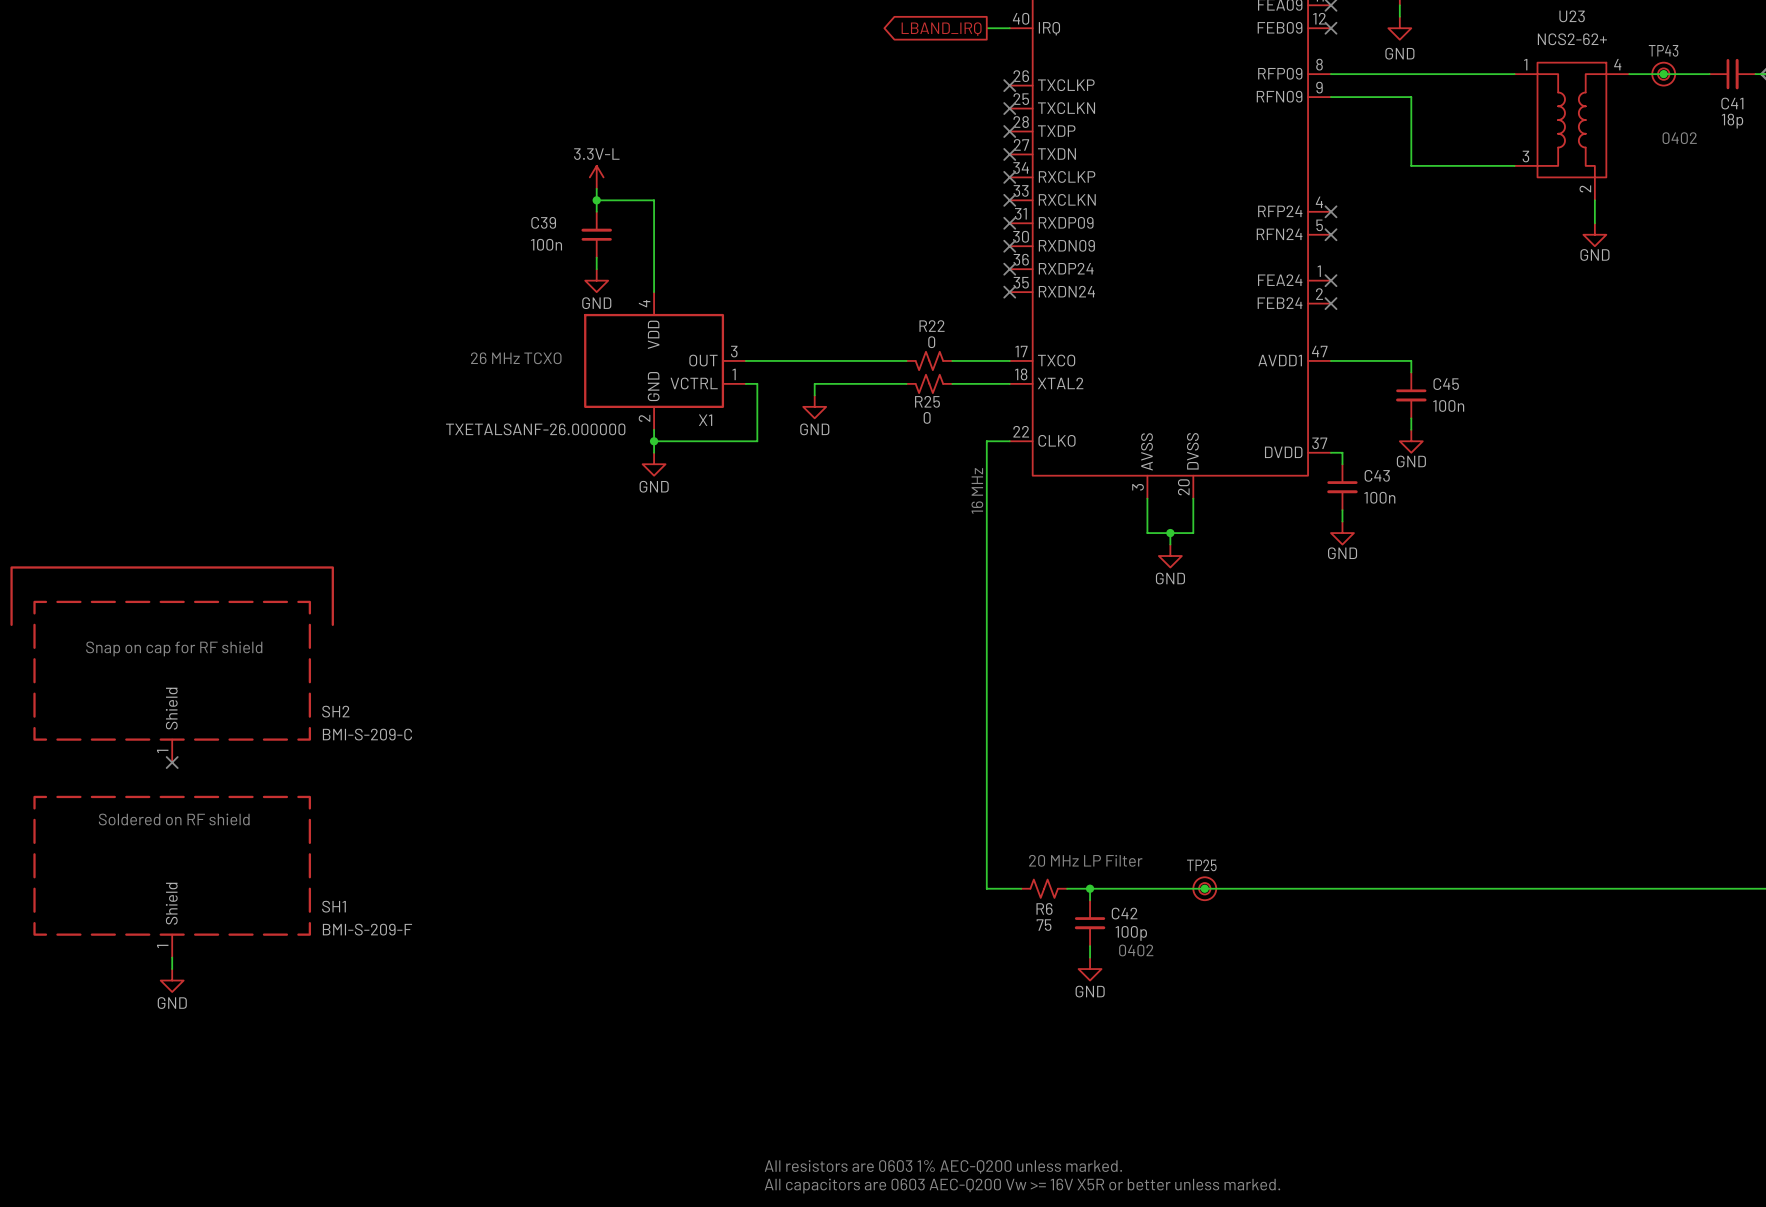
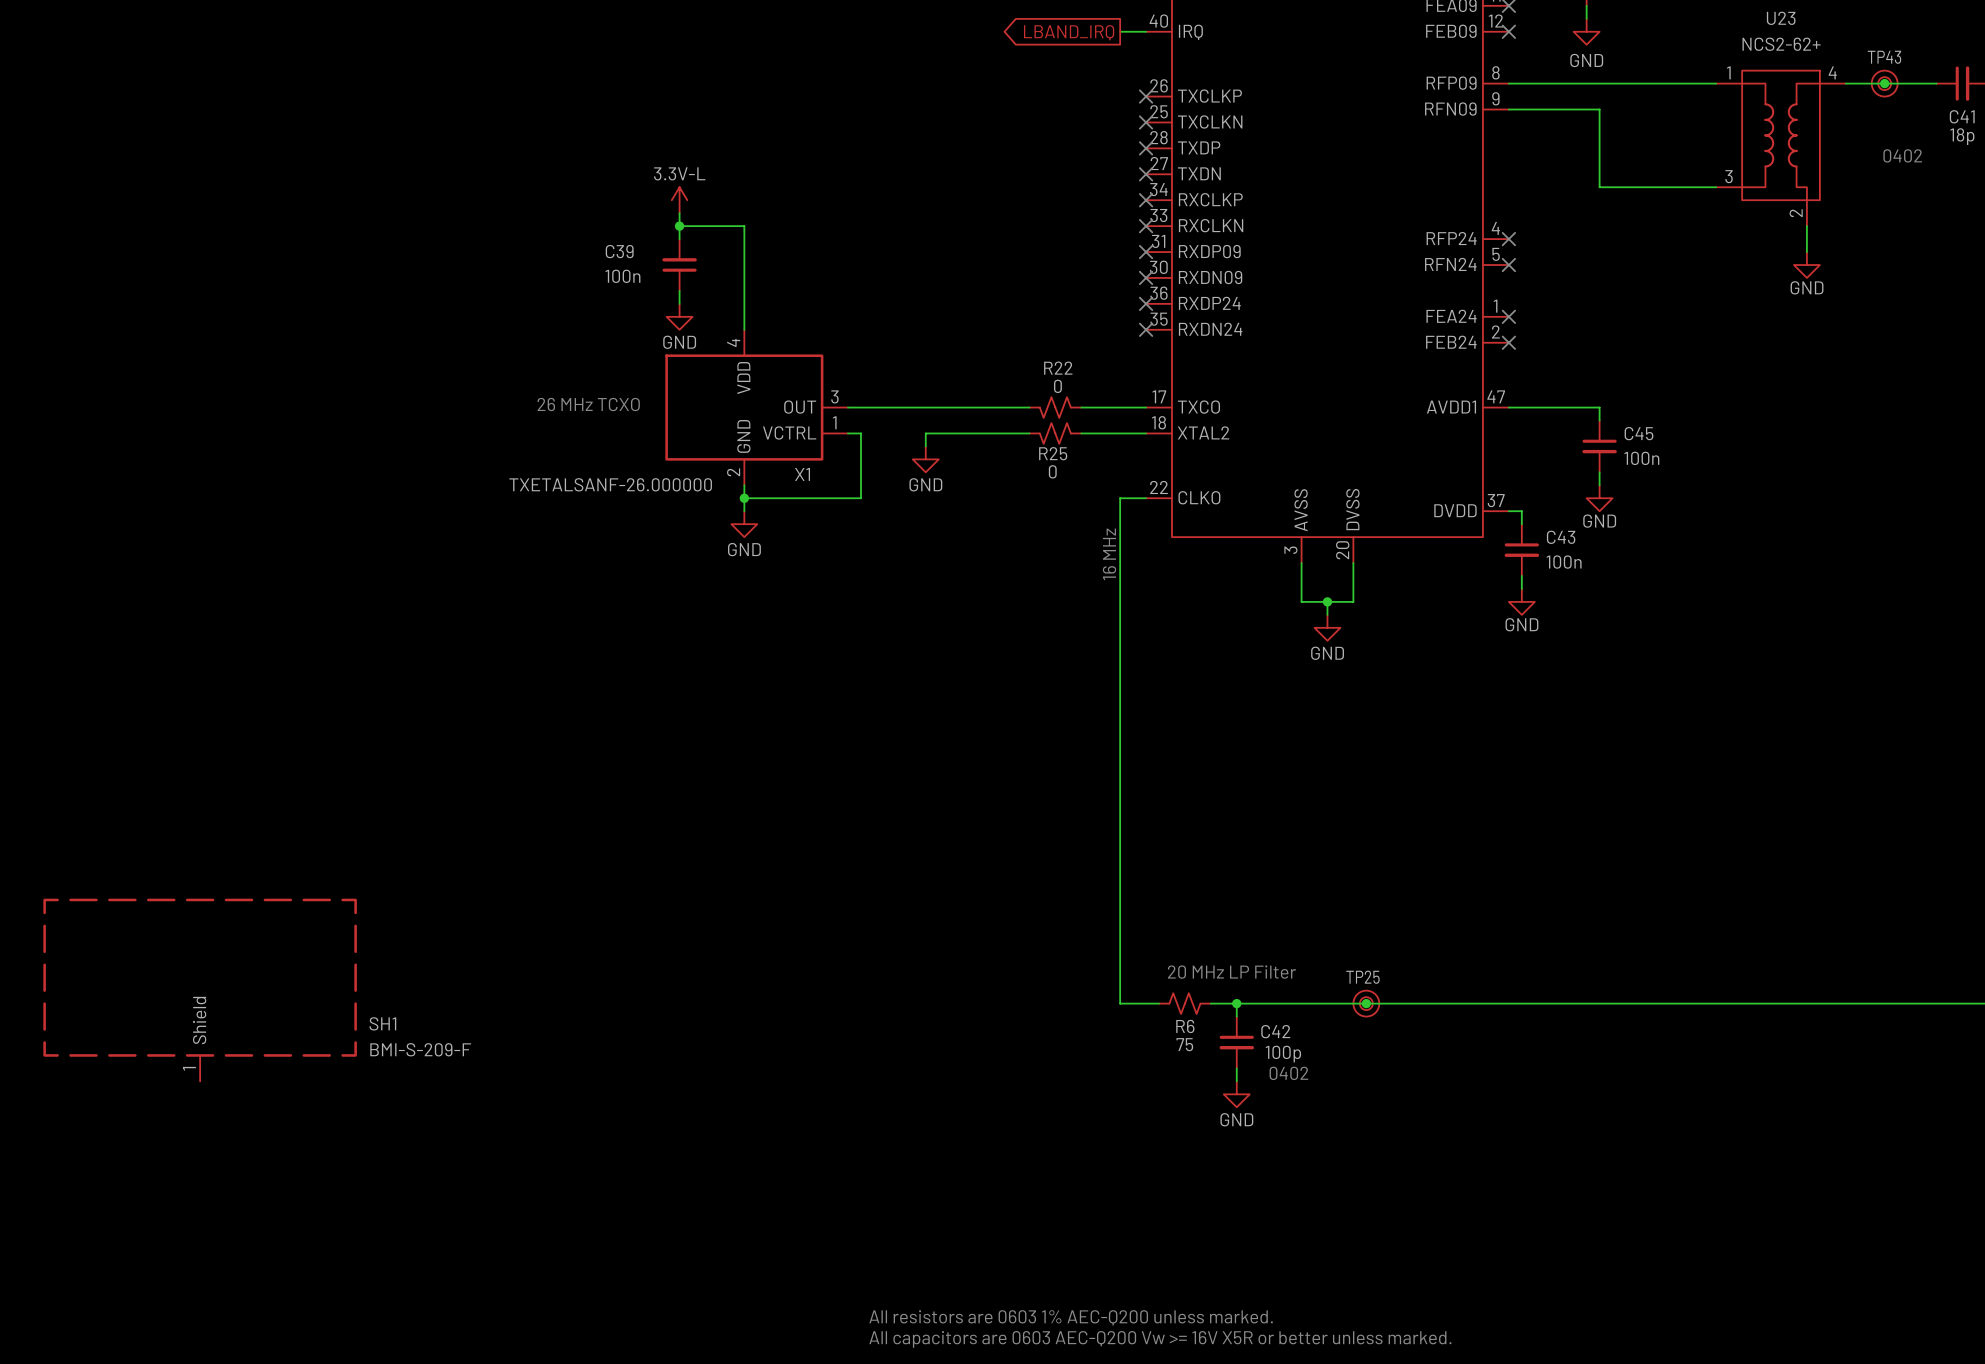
text: Snap on cap for RF shield (174, 648) -> none
SH2: BMI-S-209-C (172, 664) -> none
no-connect mark: (172, 762) -> none
text: Soldered on RF shield (174, 819) -> none
wire: (172, 957) (172, 969) -> none
power symbol: GND (172, 980) -> none

